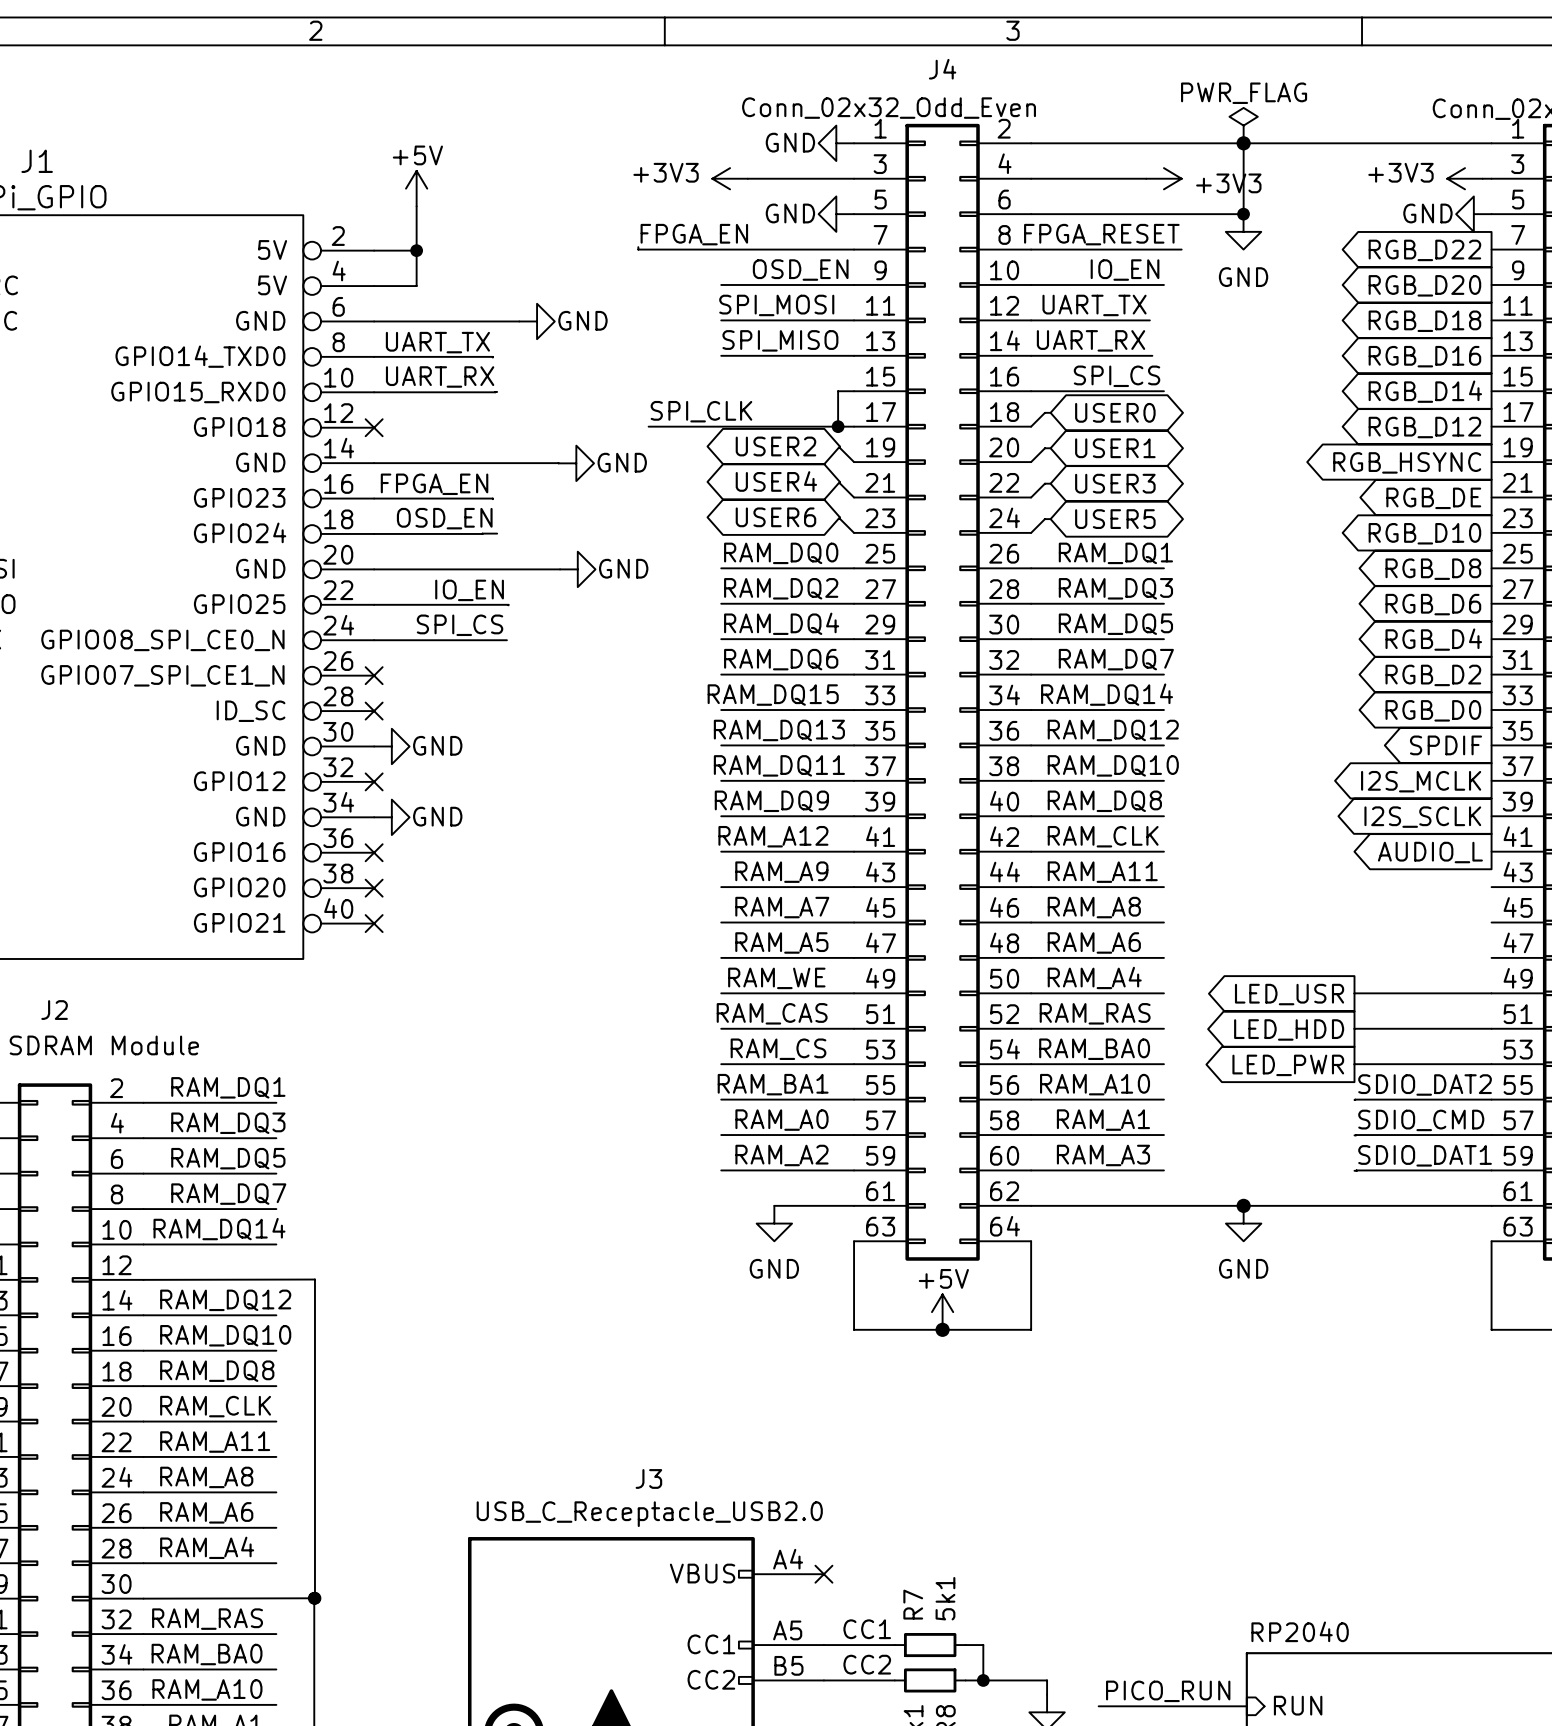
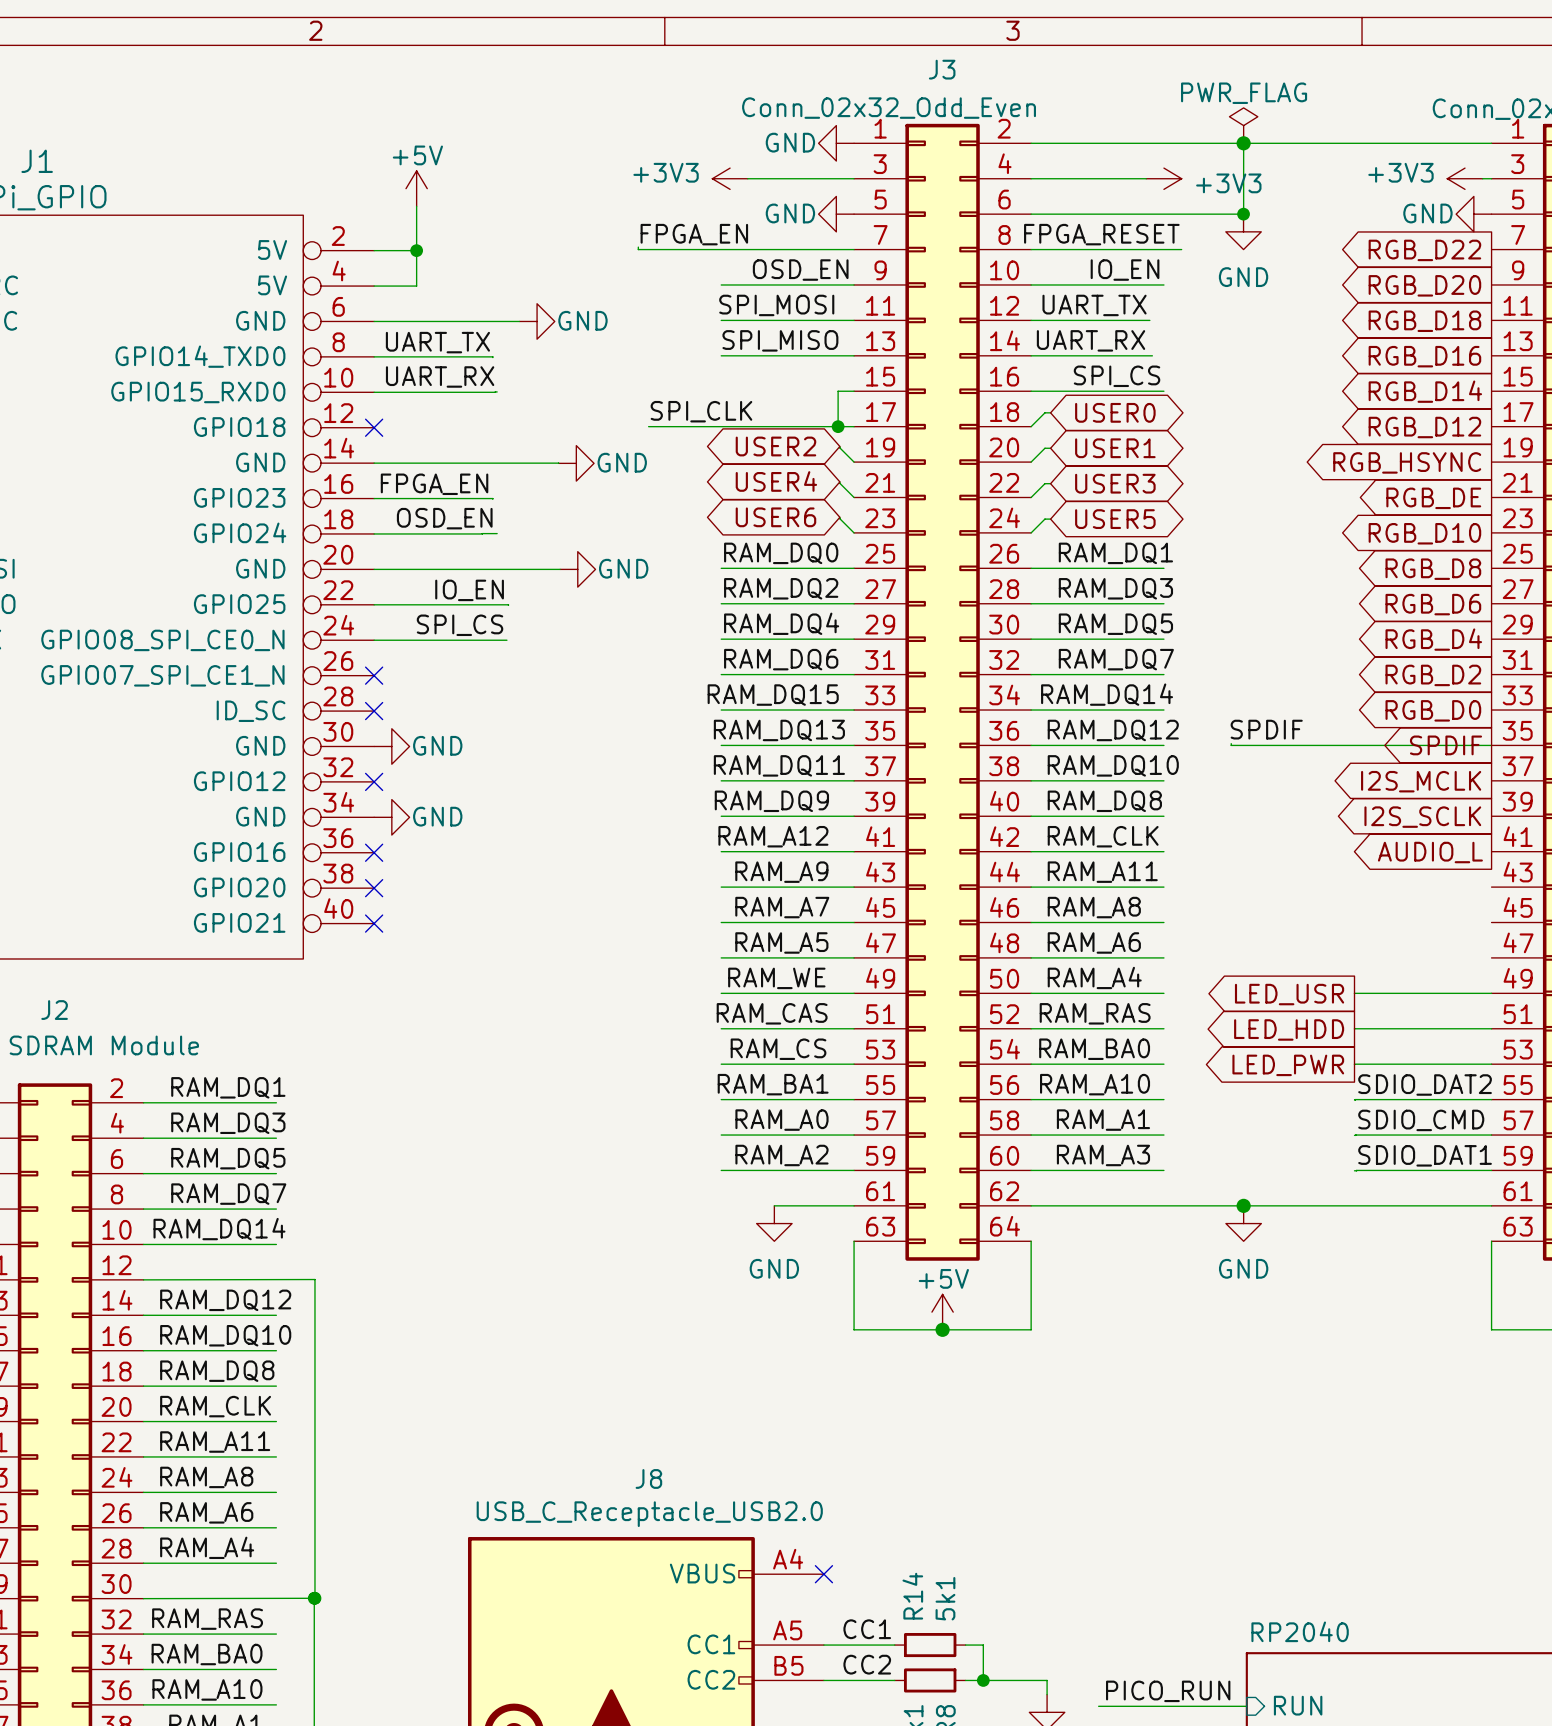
J4 name: J4 (942, 69) -> J3 (942, 69)
label: none -> SPDIF (1266, 729)
wire: none -> (1231, 743) (1231, 745) (1491, 745)
J3 name: J3 (648, 1478) -> J8 (648, 1478)
R7 name: R7 (913, 1604) -> R14 (912, 1596)

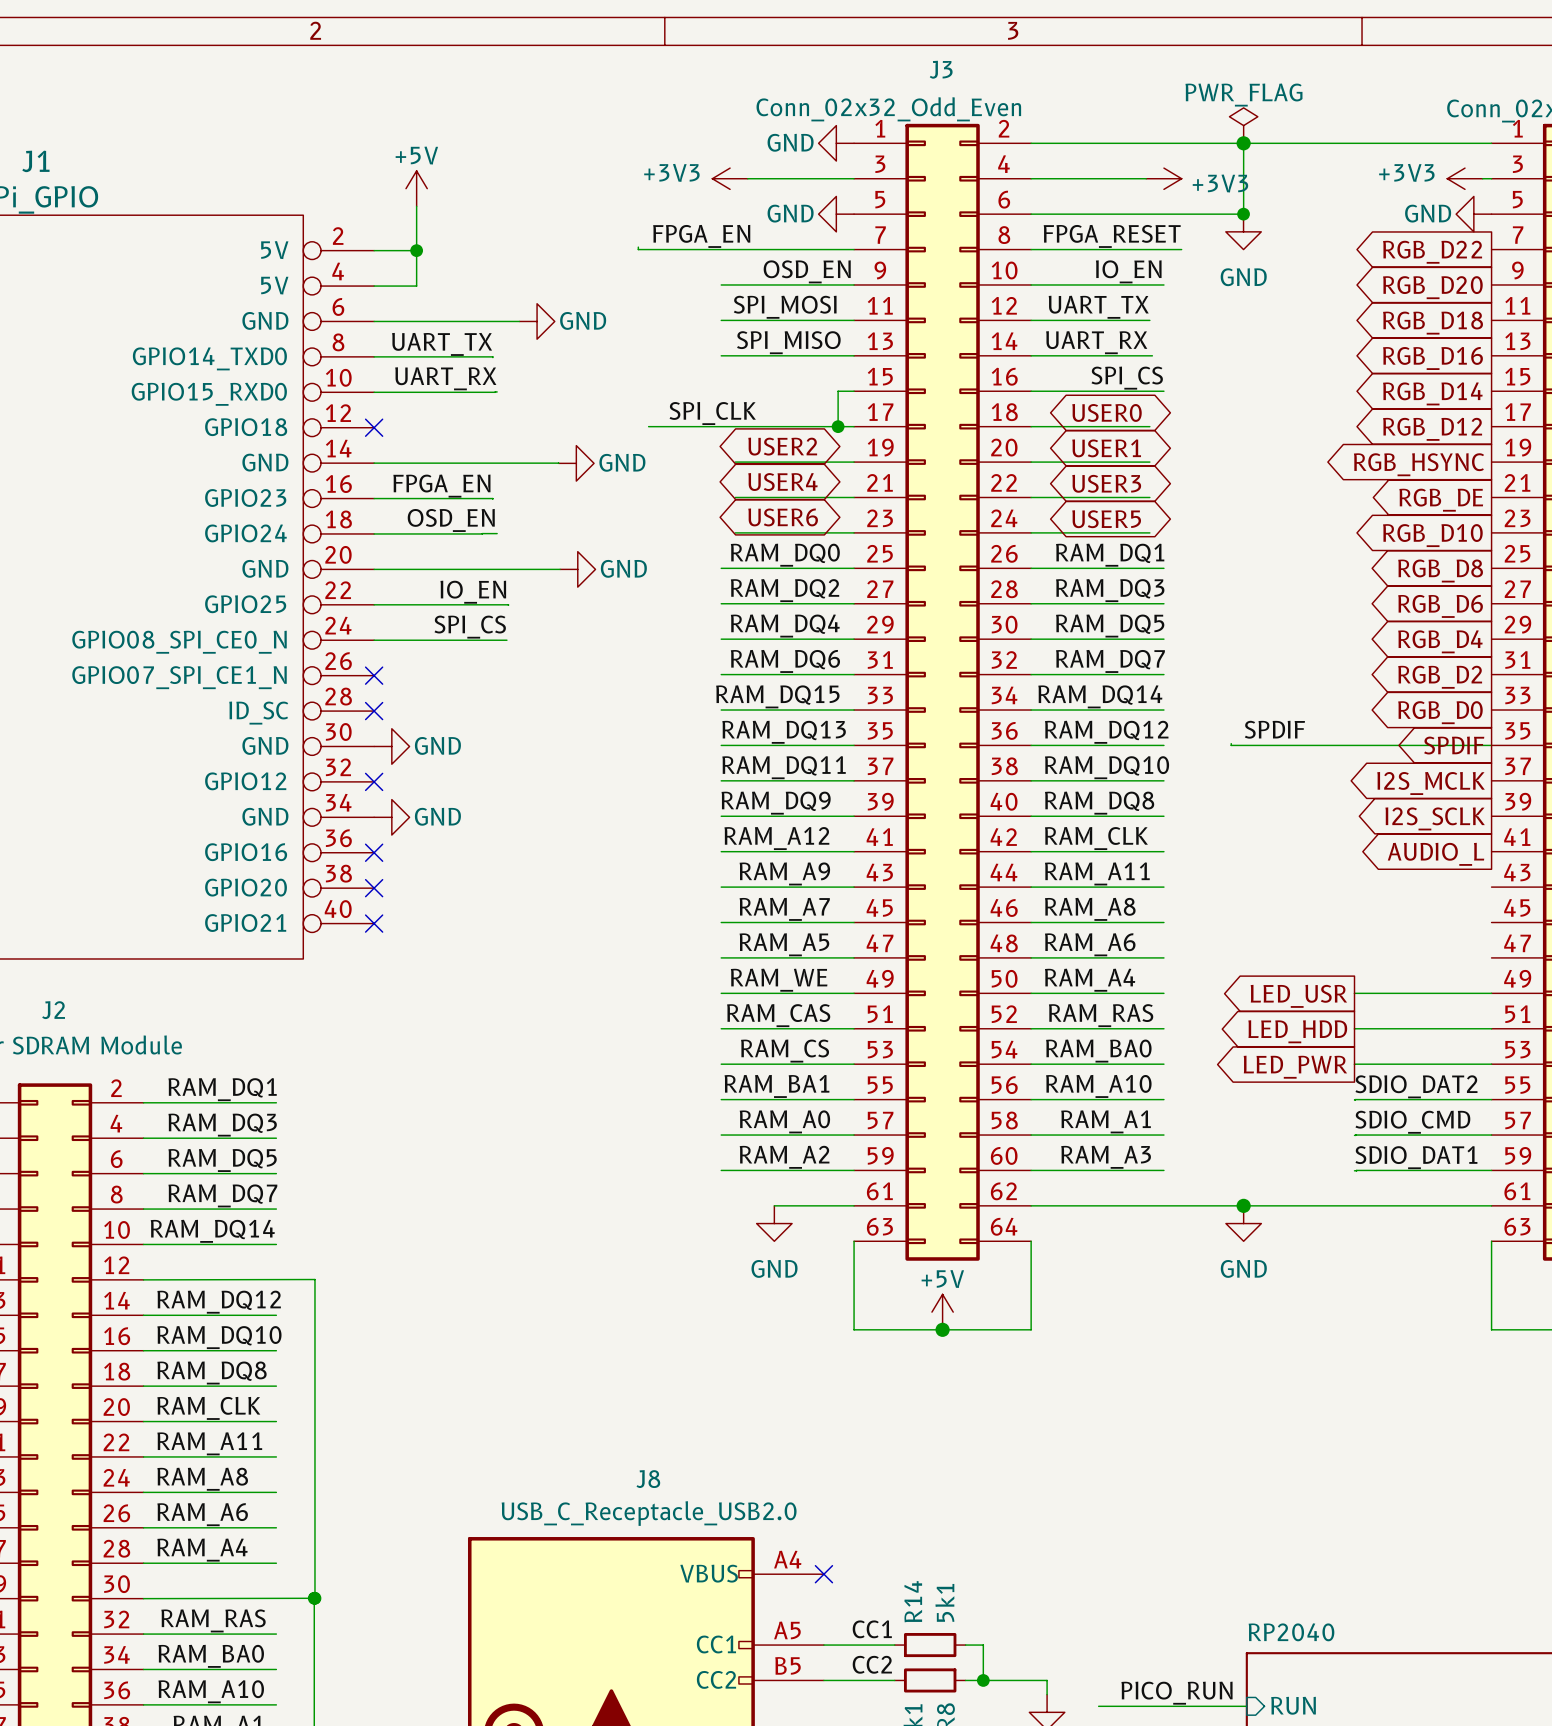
wire: (1050, 412) (1044, 412) (1031, 426) -> (1149, 426) (1031, 426)
wire: (839, 446) (854, 462) -> (735, 462) (854, 462)
wire: (1050, 448) (1044, 448) (1031, 462) -> (1149, 462) (1031, 462)
wire: (839, 481) (854, 497) -> (735, 497) (854, 497)
wire: (1050, 483) (1044, 483) (1031, 497) -> (1149, 497) (1031, 497)
wire: (839, 517) (854, 532) -> (735, 532) (854, 532)
wire: (1050, 519) (1044, 519) (1031, 532) -> (1149, 532) (1031, 532)

